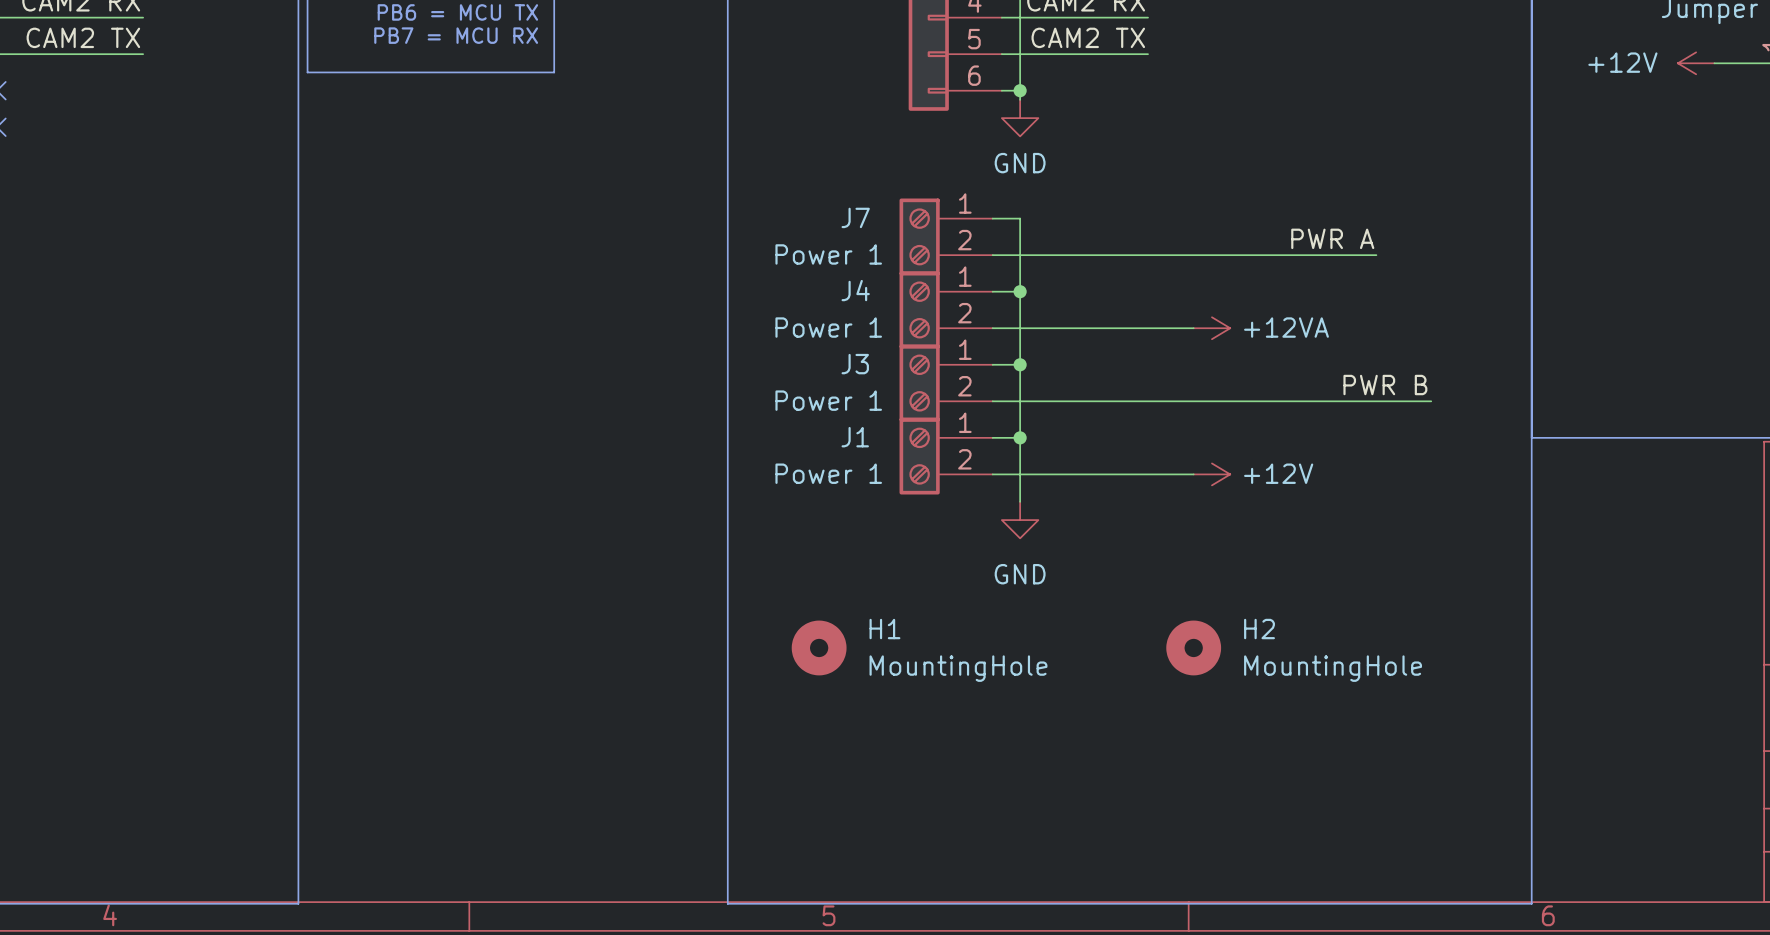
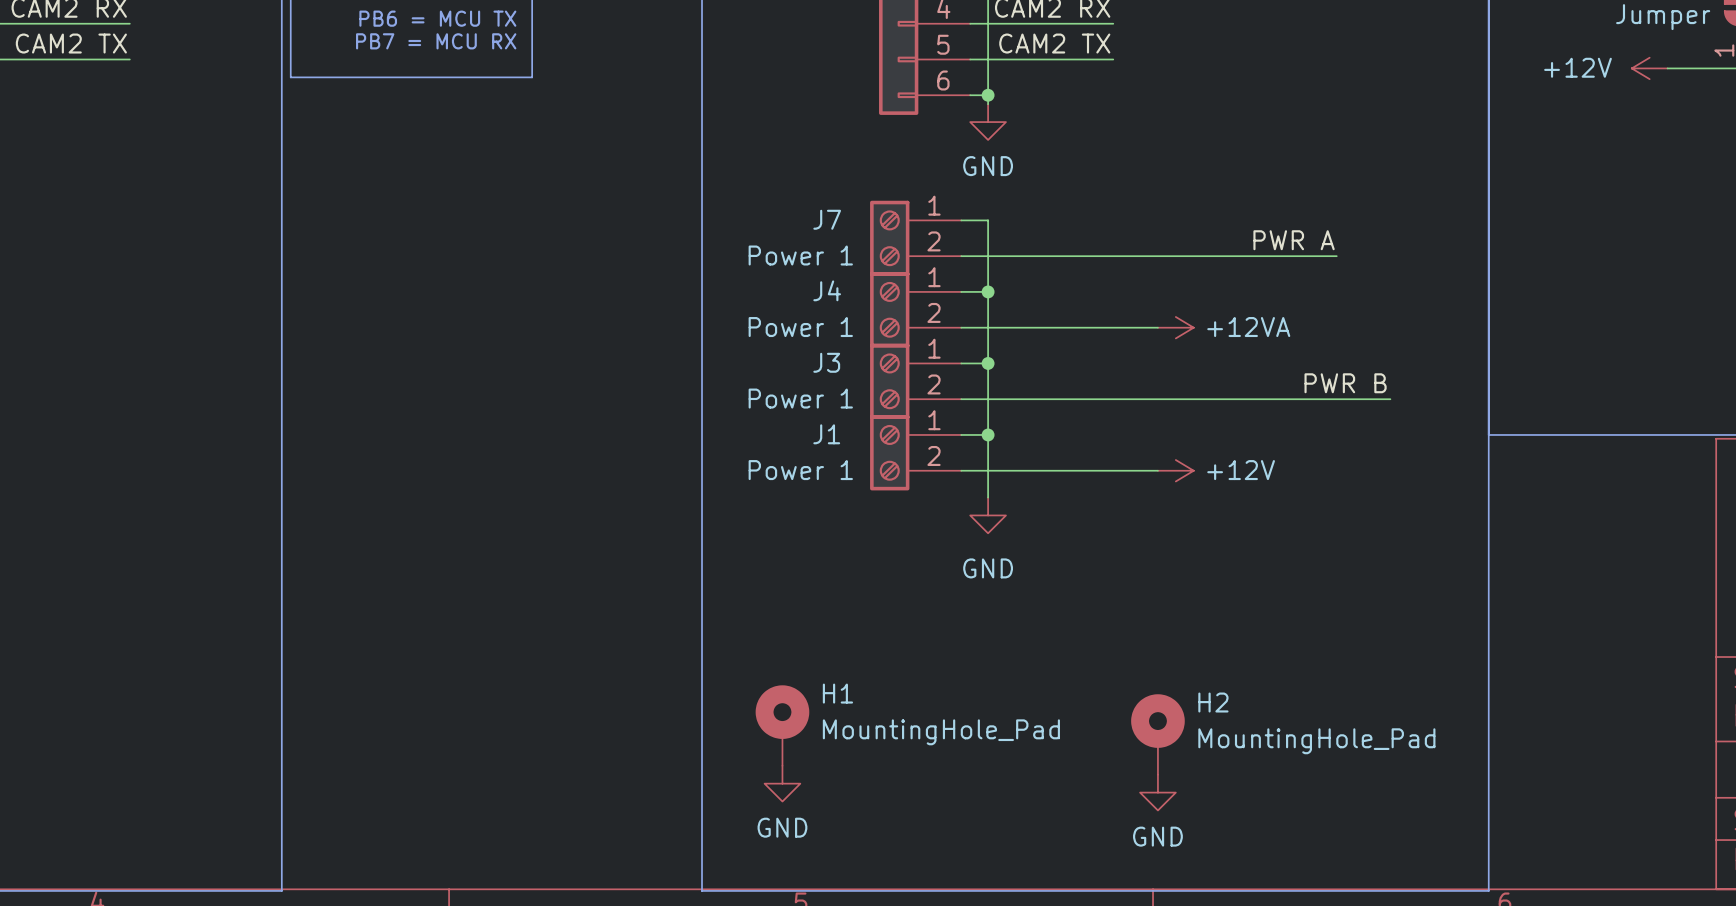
H1 symbol: [791, 620, 847, 676] -> [755, 685, 810, 766]
H2 symbol: [1166, 620, 1222, 676] -> [1131, 694, 1185, 775]
H1 value: MountingHole (958, 668) -> MountingHole_Pad (941, 732)
H2 value: MountingHole (1333, 668) -> MountingHole_Pad (1316, 741)
power symbol: none -> GND (782, 783)
power symbol: none -> GND (1157, 792)

